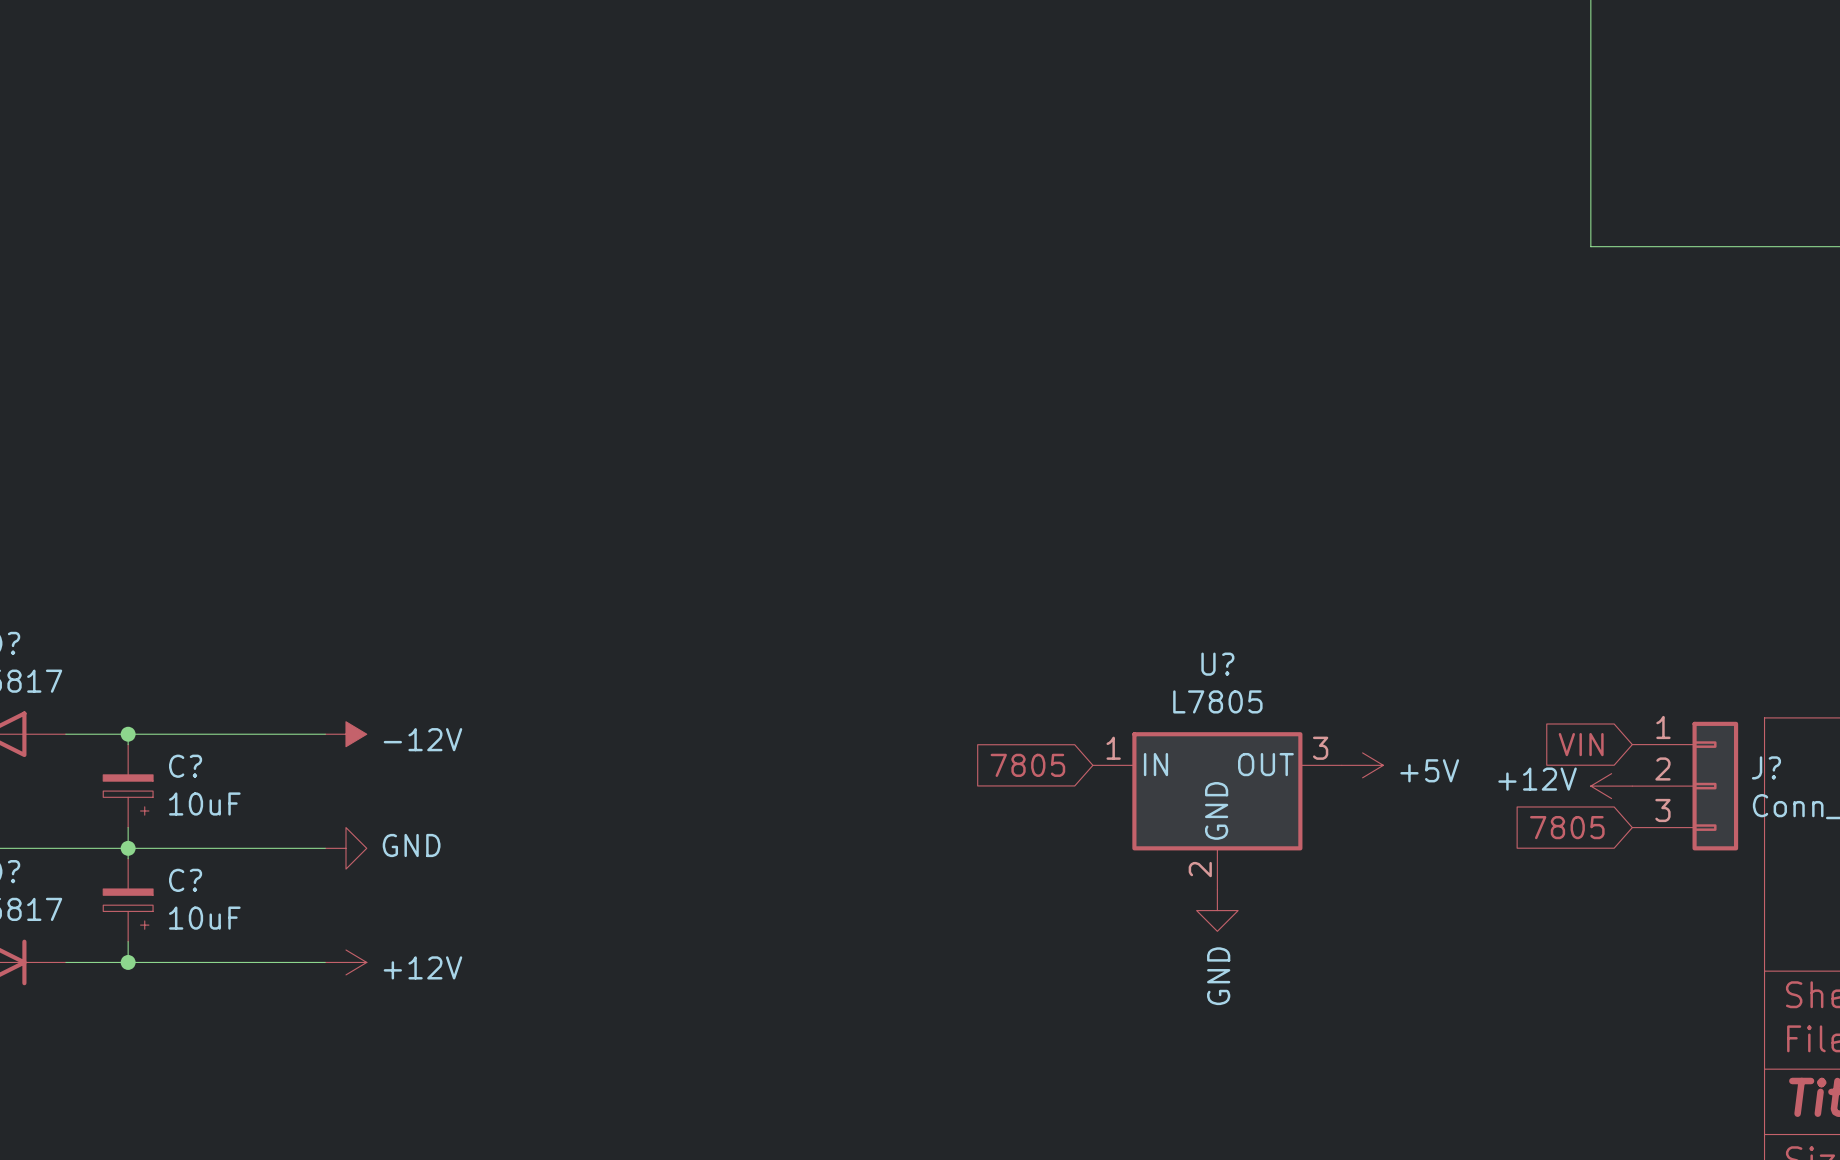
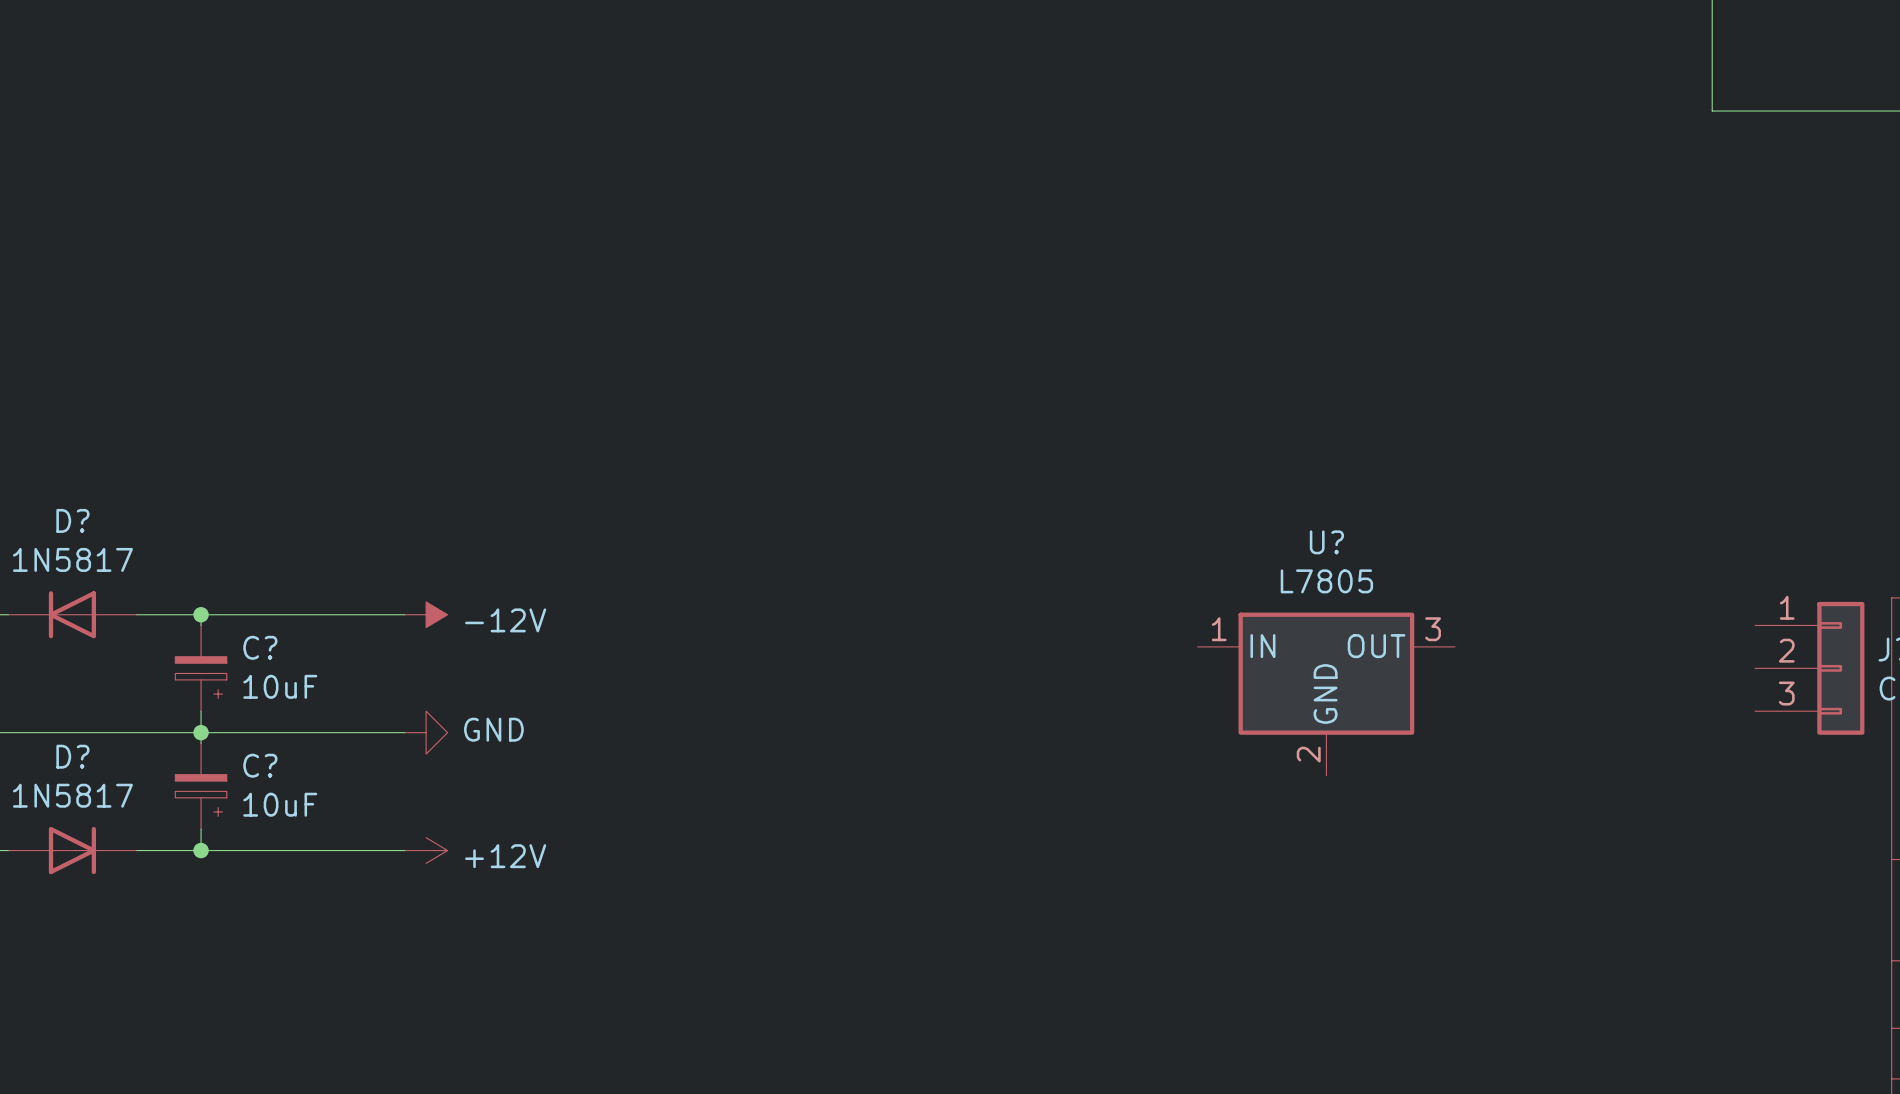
global label: VIN (1581, 744) -> none
global label: 7805 (1027, 765) -> none
power symbol: +5V (1362, 765) -> none
power symbol: +12V (1611, 786) -> none
global label: 7805 (1567, 827) -> none
power symbol: GND (1217, 910) -> none

